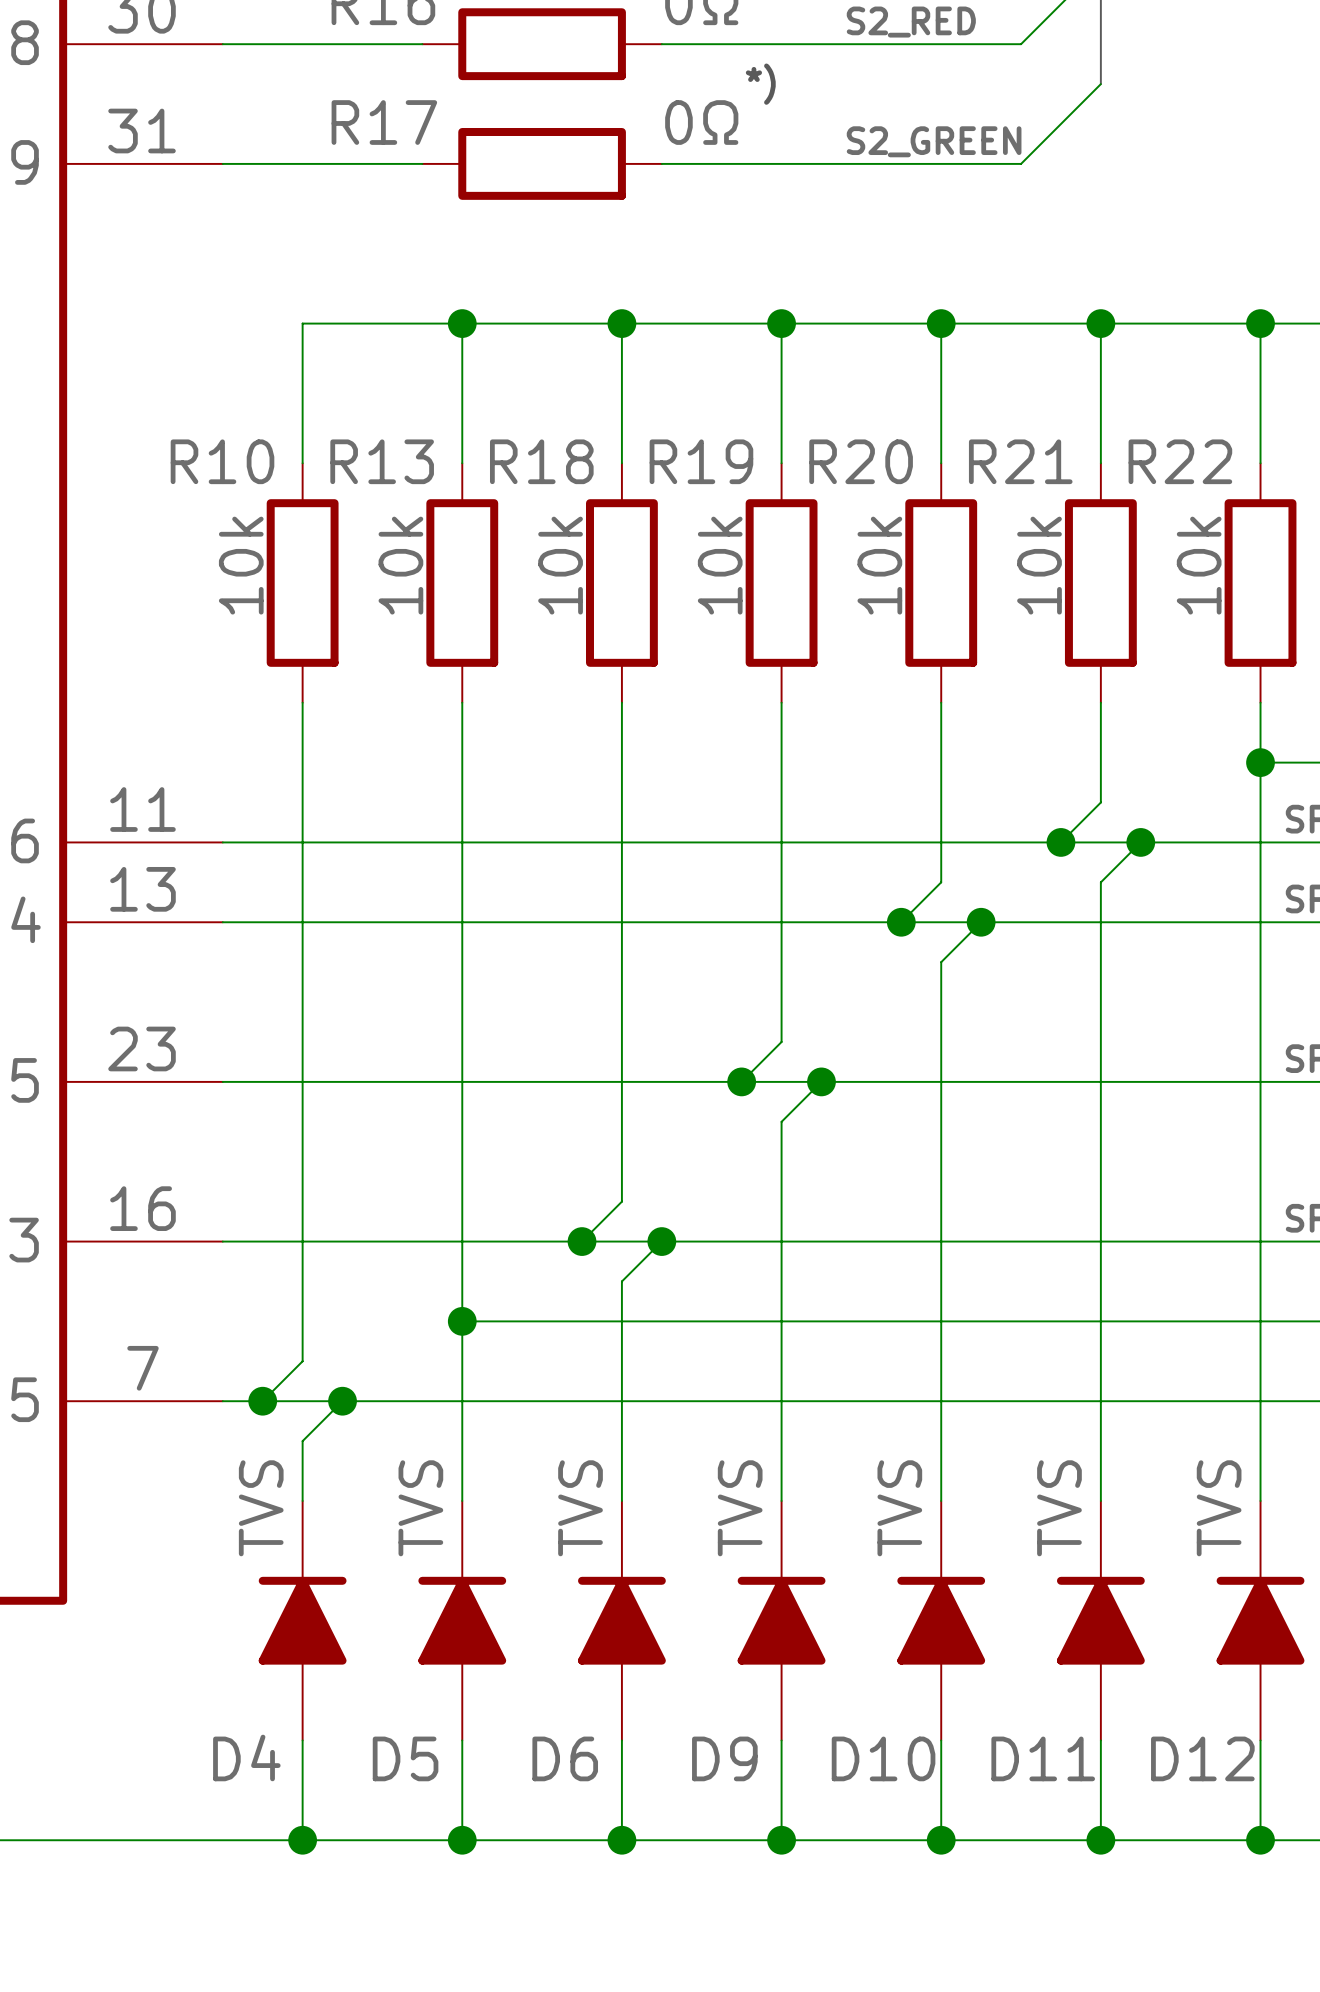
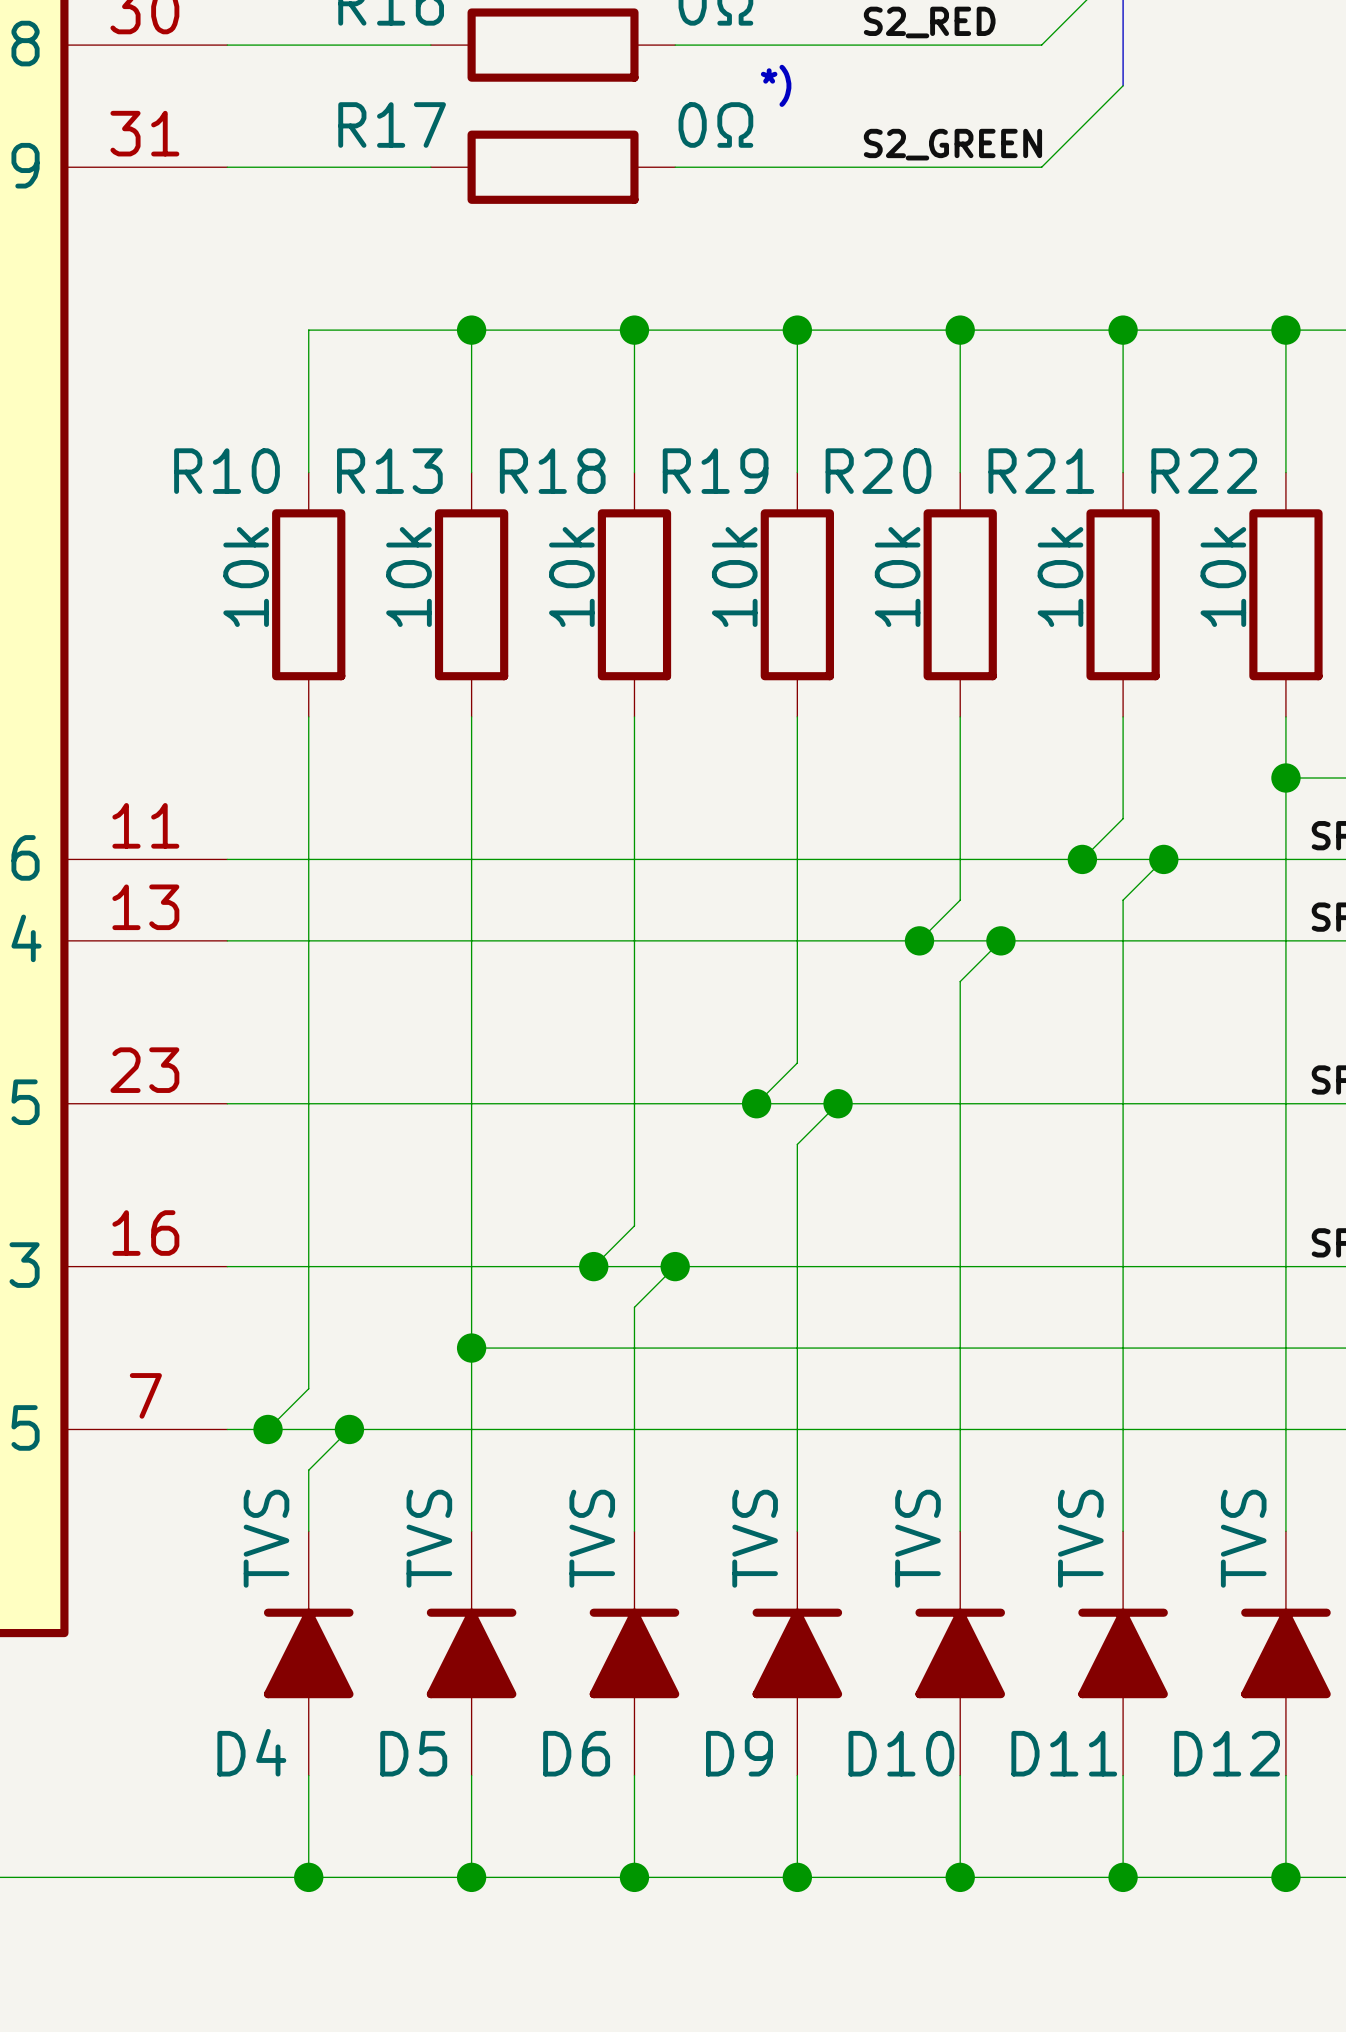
D4 name position: D4 (246, 1757) -> D4 (251, 1752)
D5 name position: D5 (405, 1758) -> D5 (413, 1753)
D6 name position: D6 (565, 1758) -> D6 (576, 1753)
D9 name position: D9 (724, 1758) -> D9 (739, 1753)
D10 name position: D10 (883, 1758) -> D10 (901, 1753)
D11 name position: D11 (1043, 1758) -> D11 (1064, 1753)
D12 name position: D12 (1202, 1758) -> D12 (1227, 1753)

